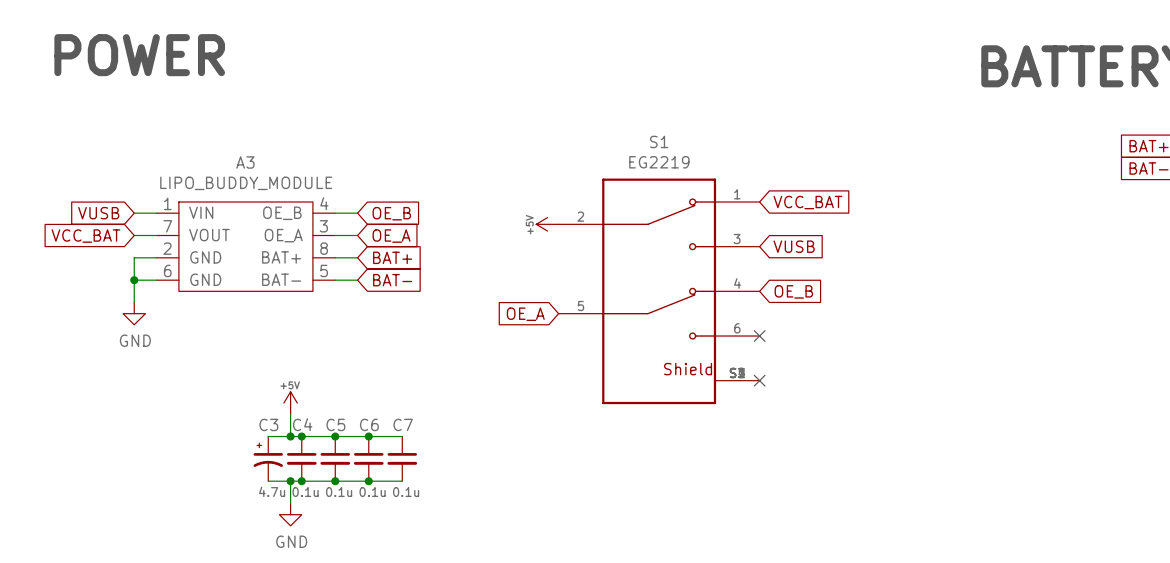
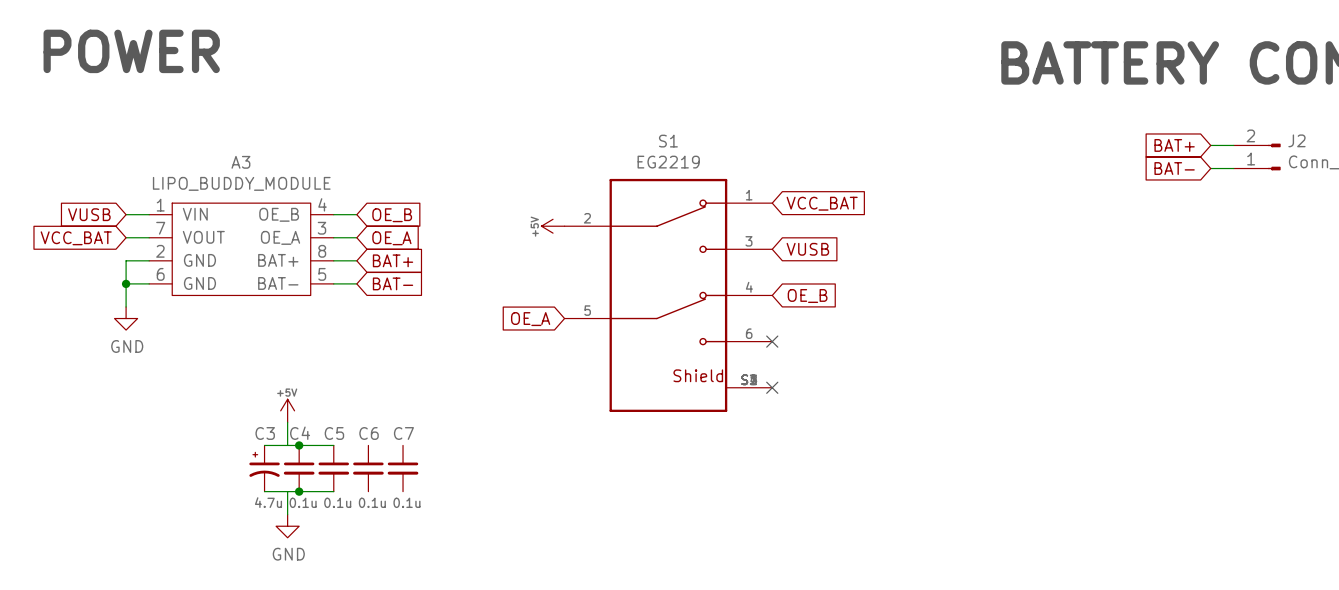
junction: (290, 436) -> none
wire: (335, 436) (402, 436) -> none
junction: (335, 436) -> none
junction: (368, 436) -> none
junction: (290, 481) -> none
wire: (335, 481) (402, 481) -> none
junction: (335, 481) -> none
junction: (368, 481) -> none

